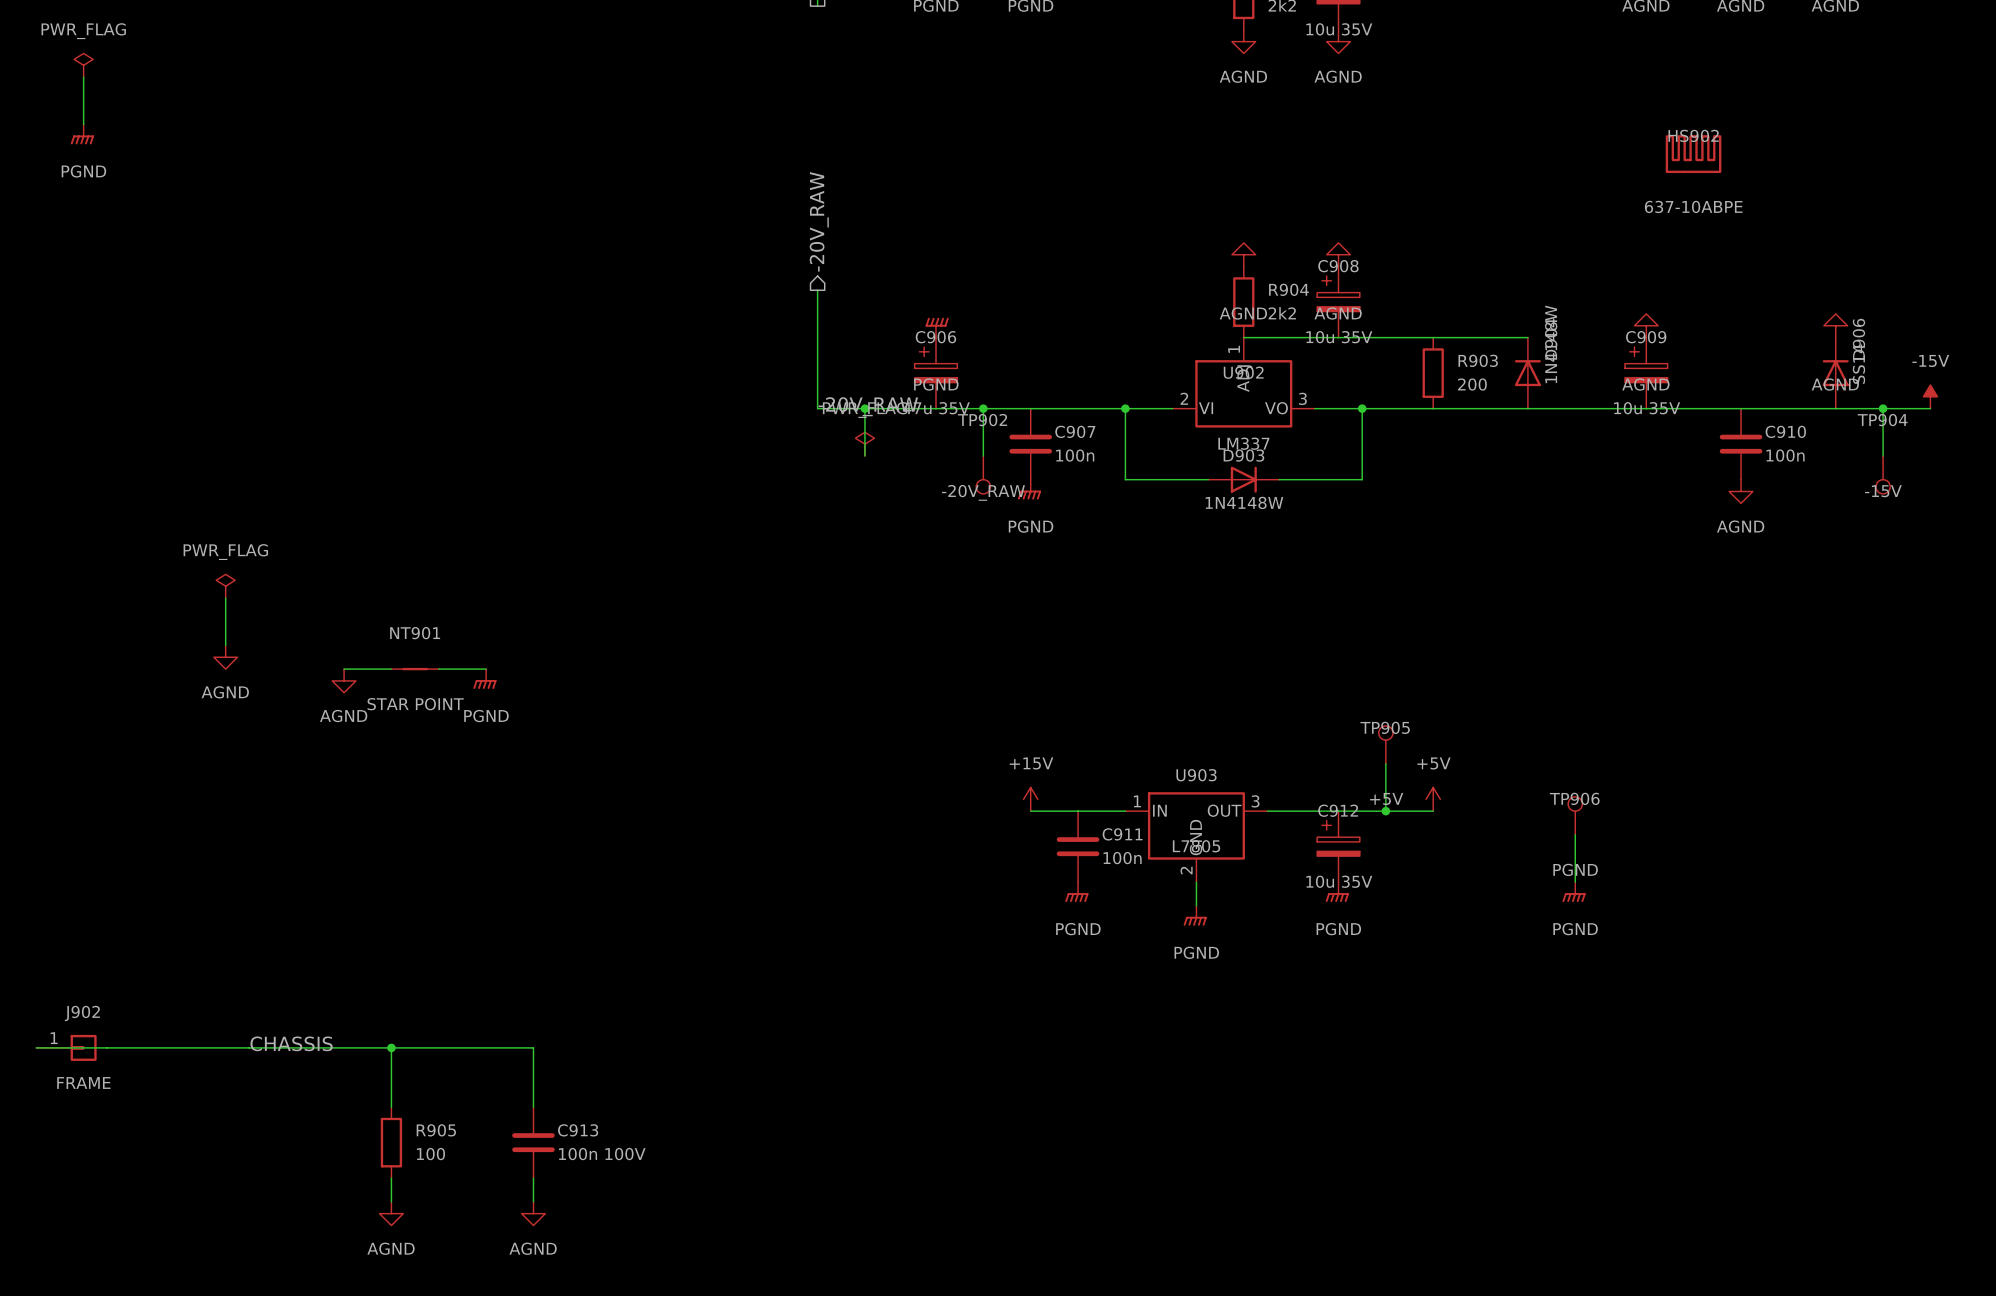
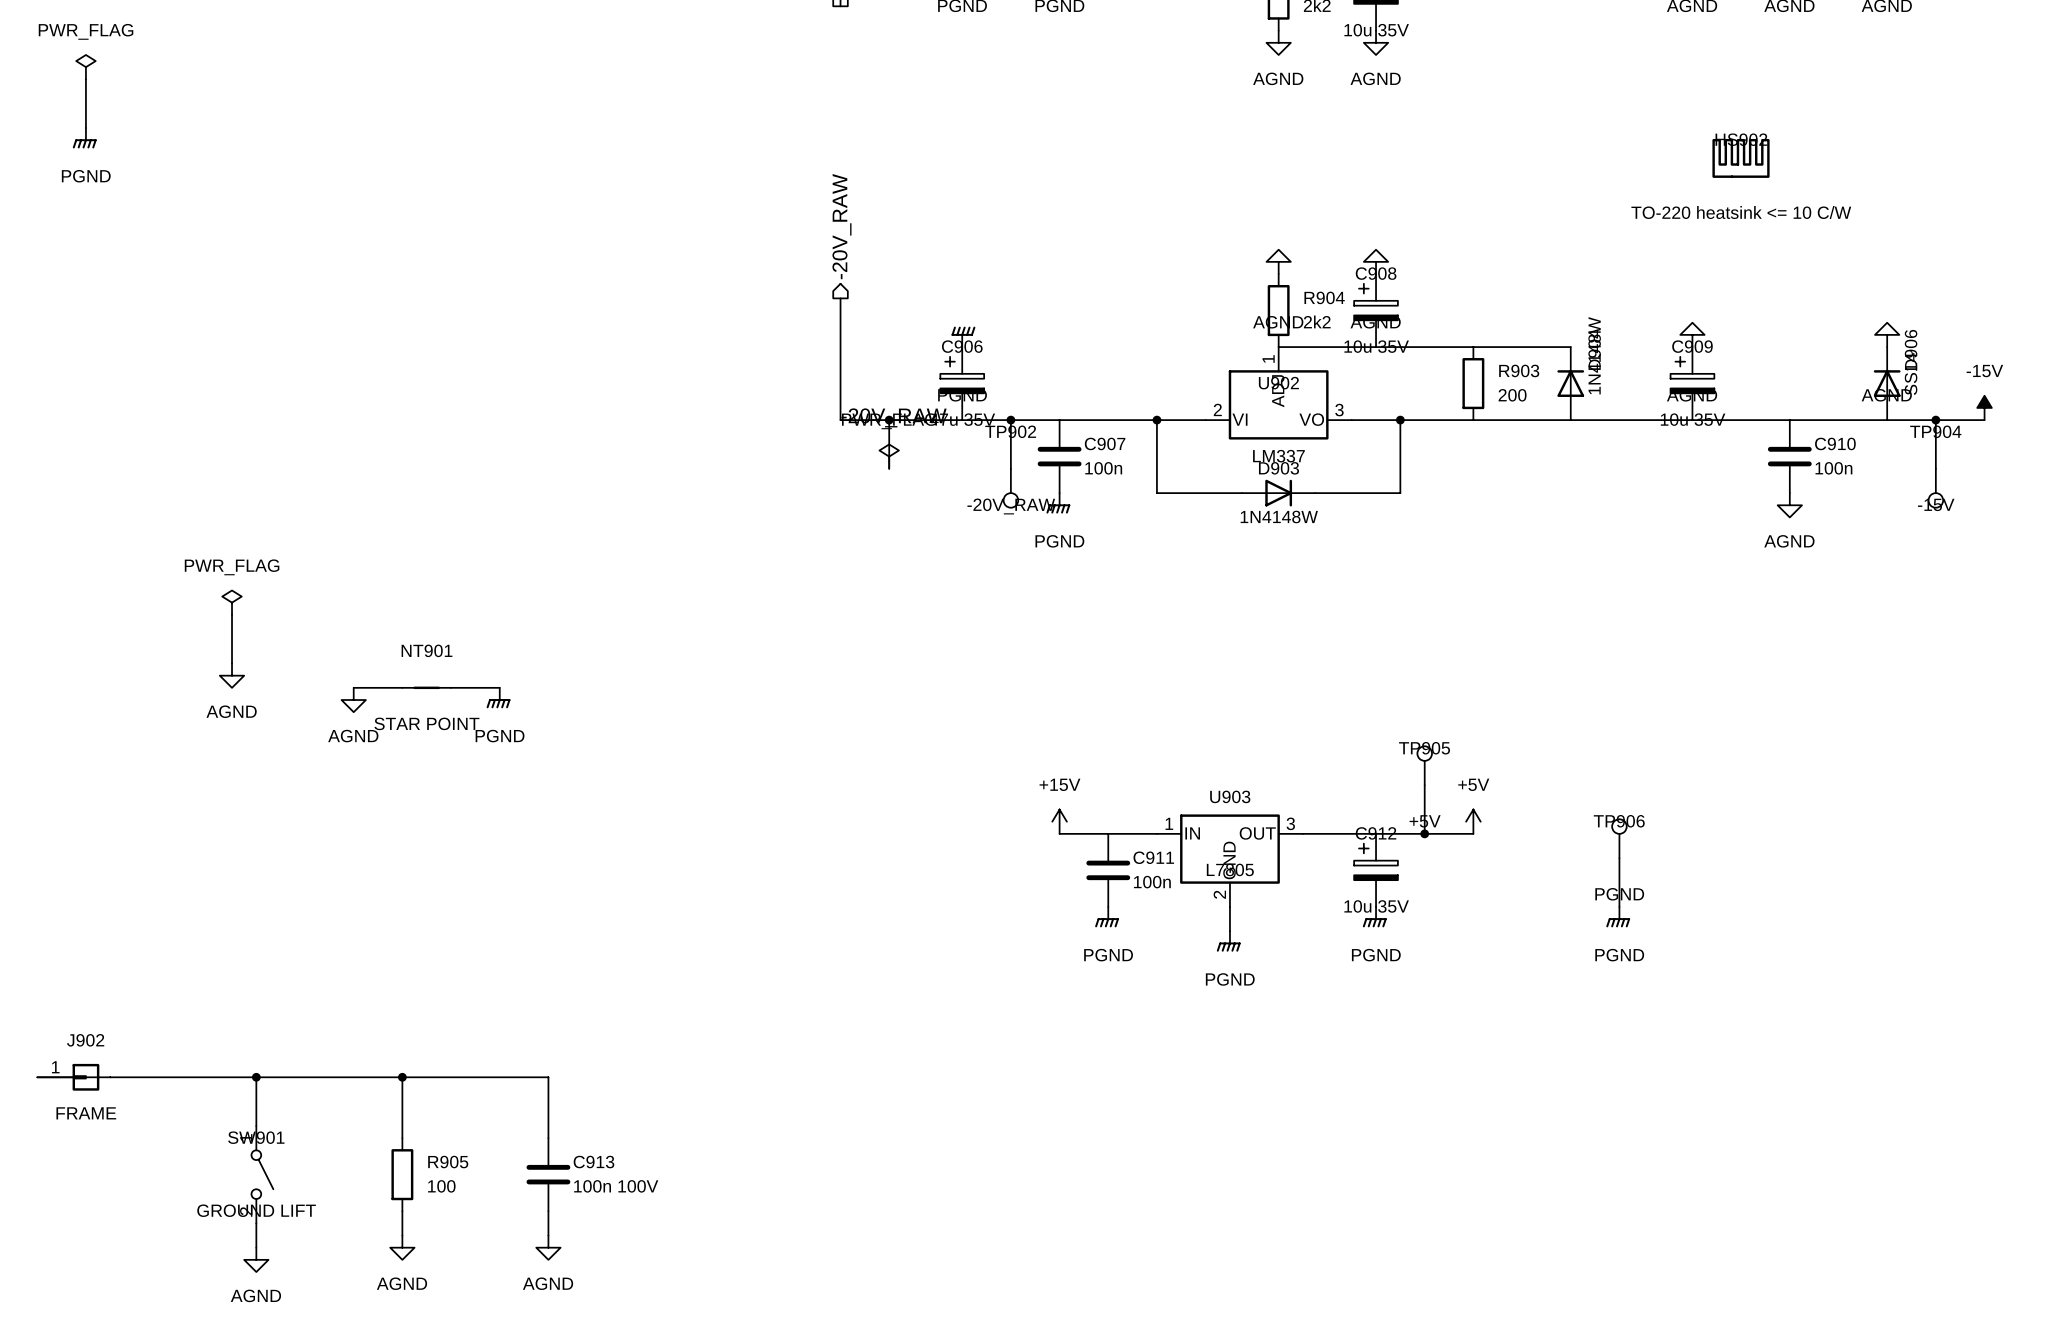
HS902 value: 637-10ABPE (1693, 206) -> TO-220 heatsink <= 10 C/W (1741, 212)
label: CHASSIS (291, 1043) -> none
wire: none -> (256, 1077) (256, 1125)
junction: none -> (256, 1077)
SW901: none -> GROUND LIFT (262, 1174)
wire: none -> (256, 1223) (256, 1247)
power symbol: none -> AGND (256, 1259)

